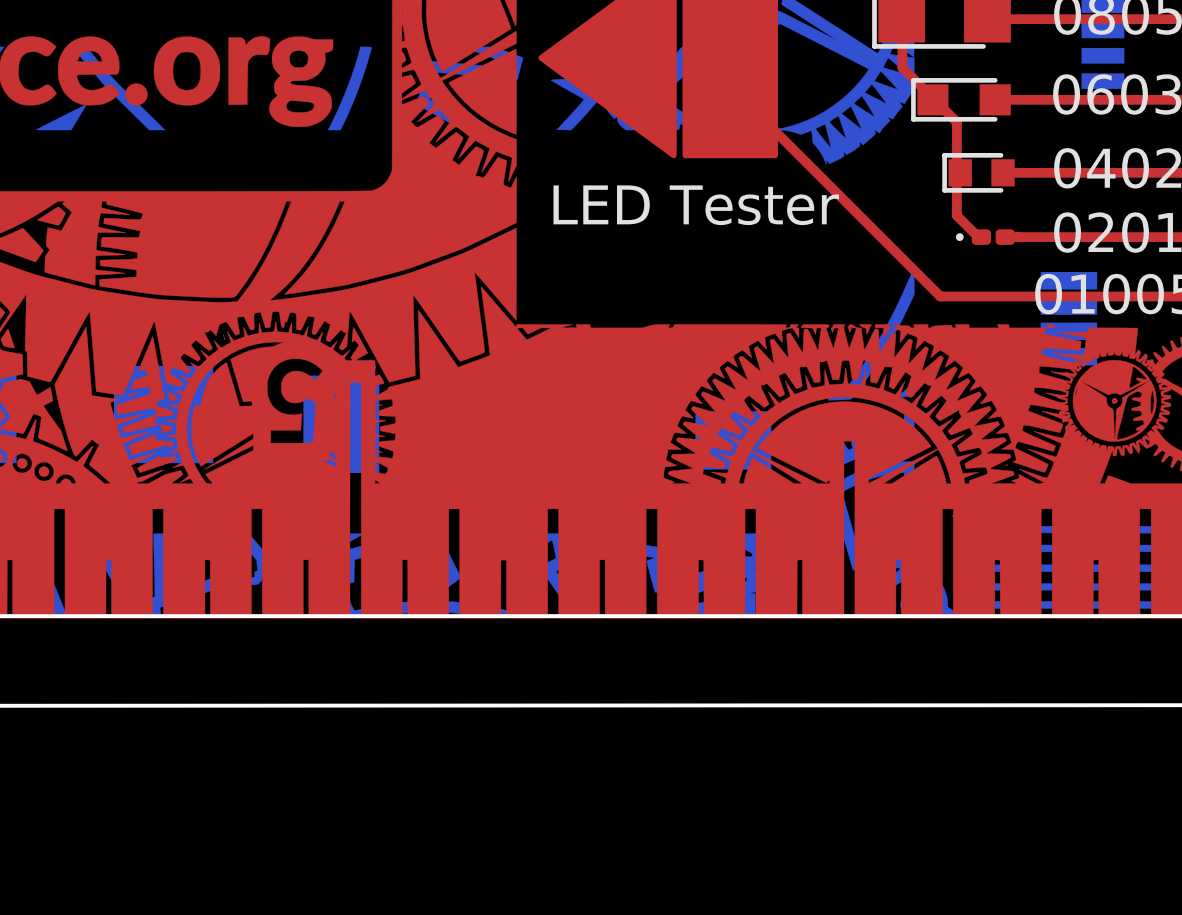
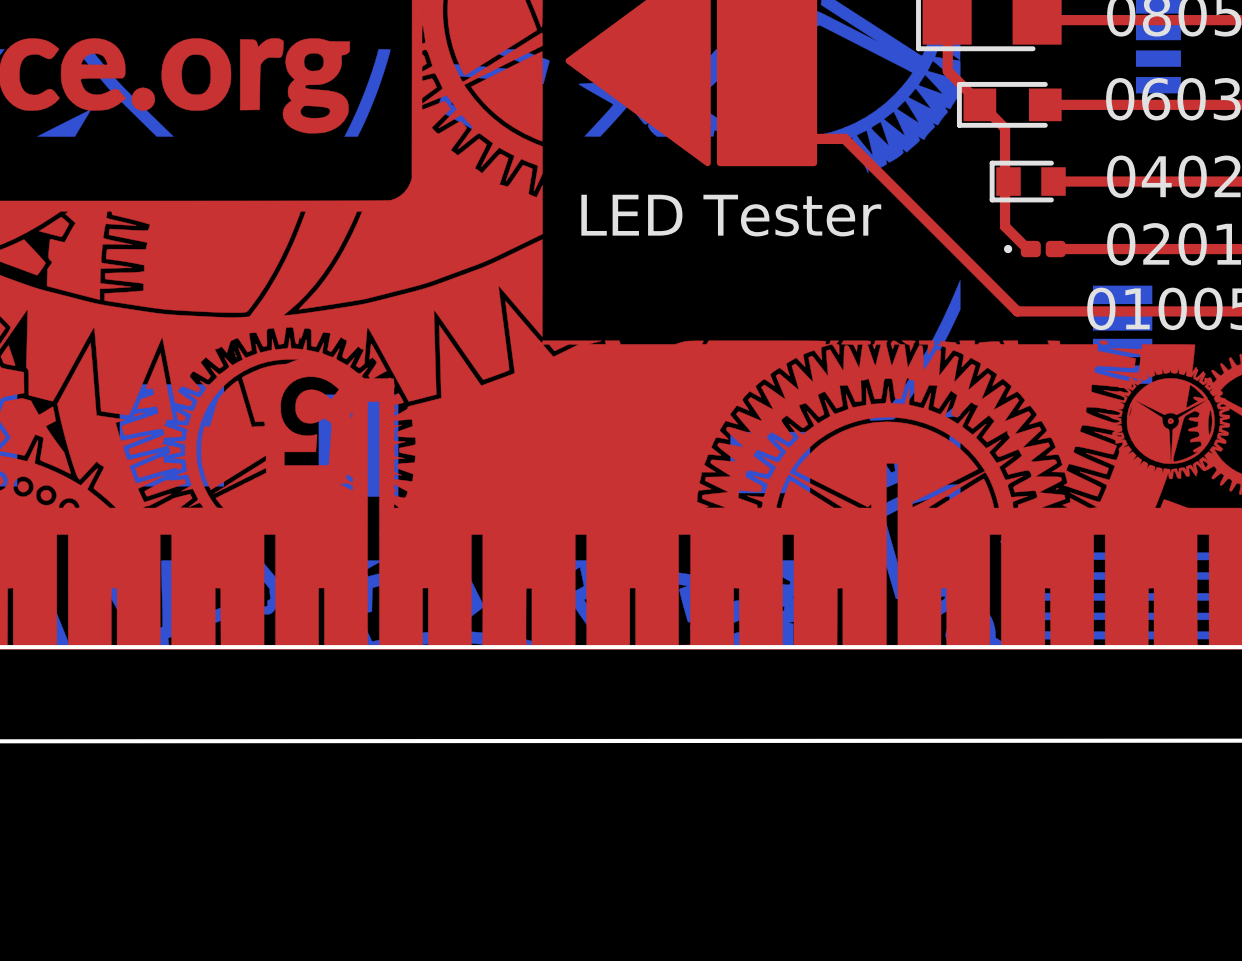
top track: (729, 85) (940, 296) (968, 296) -> (765, 89) (765, 138) (844, 138) (1017, 311)

